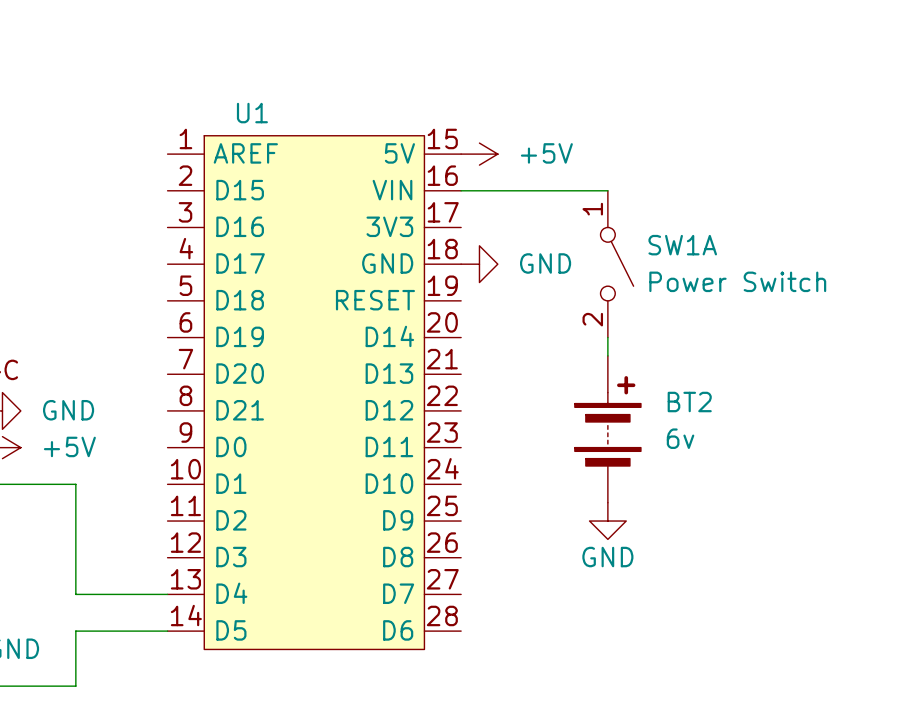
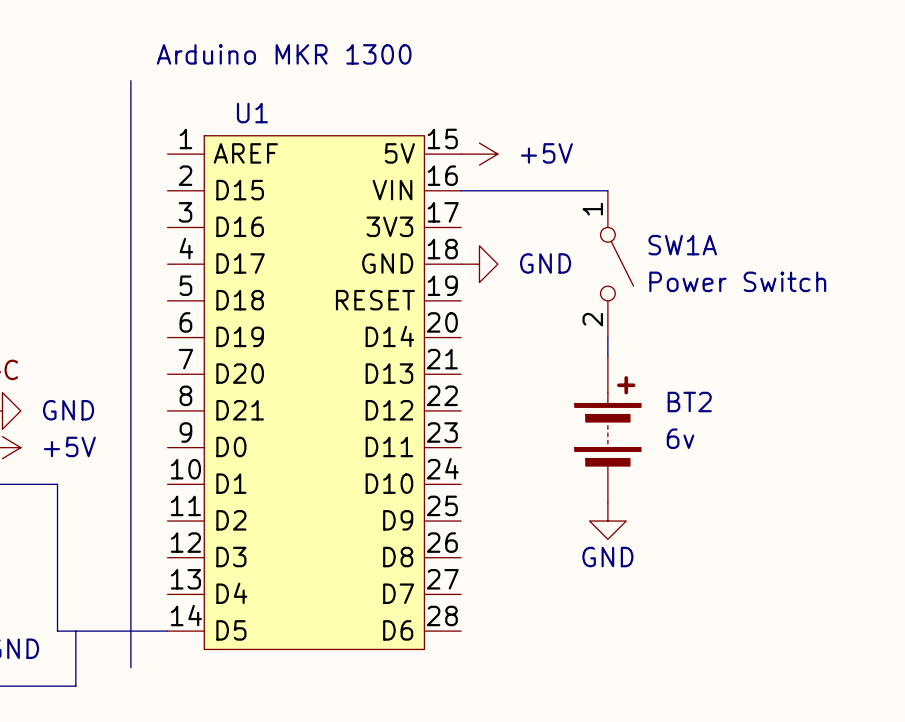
text: none -> Arduino MKR 1300 (284, 54)
line: none -> (130, 80) (130, 667)
wire: (57, 484) (75, 484) (75, 594) (167, 594) -> (57, 484) (57, 631) (75, 631)

